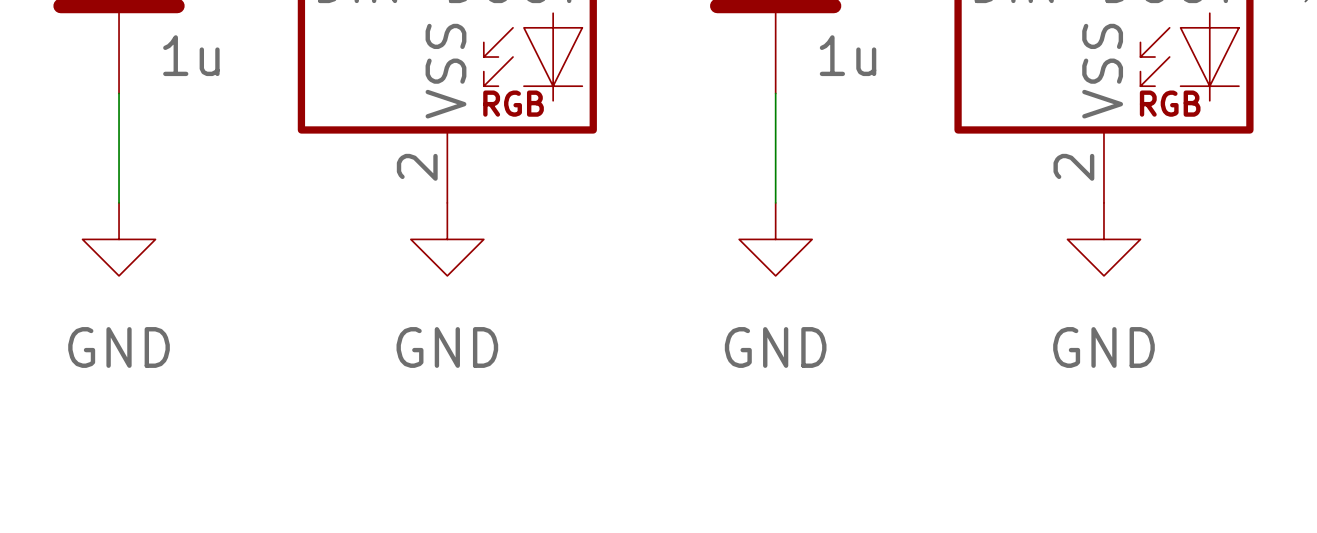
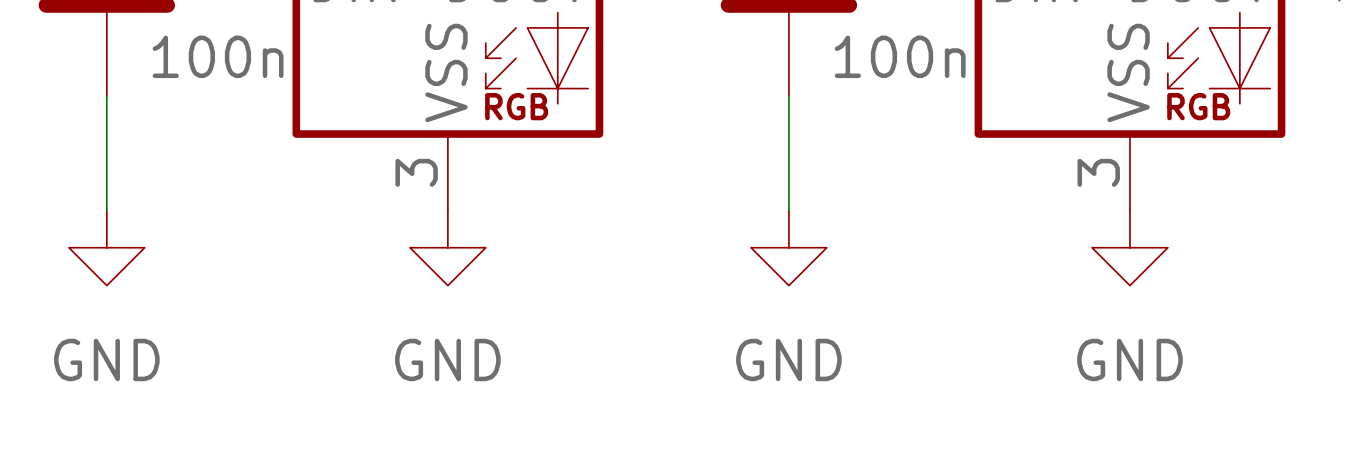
part value: 1u (191, 55) -> 100n (218, 56)
part value: 1u (848, 55) -> 100n (900, 56)
part pin number: 2 (417, 167) -> 3 (416, 172)
part pin number: 2 (1073, 167) -> 3 (1098, 172)

